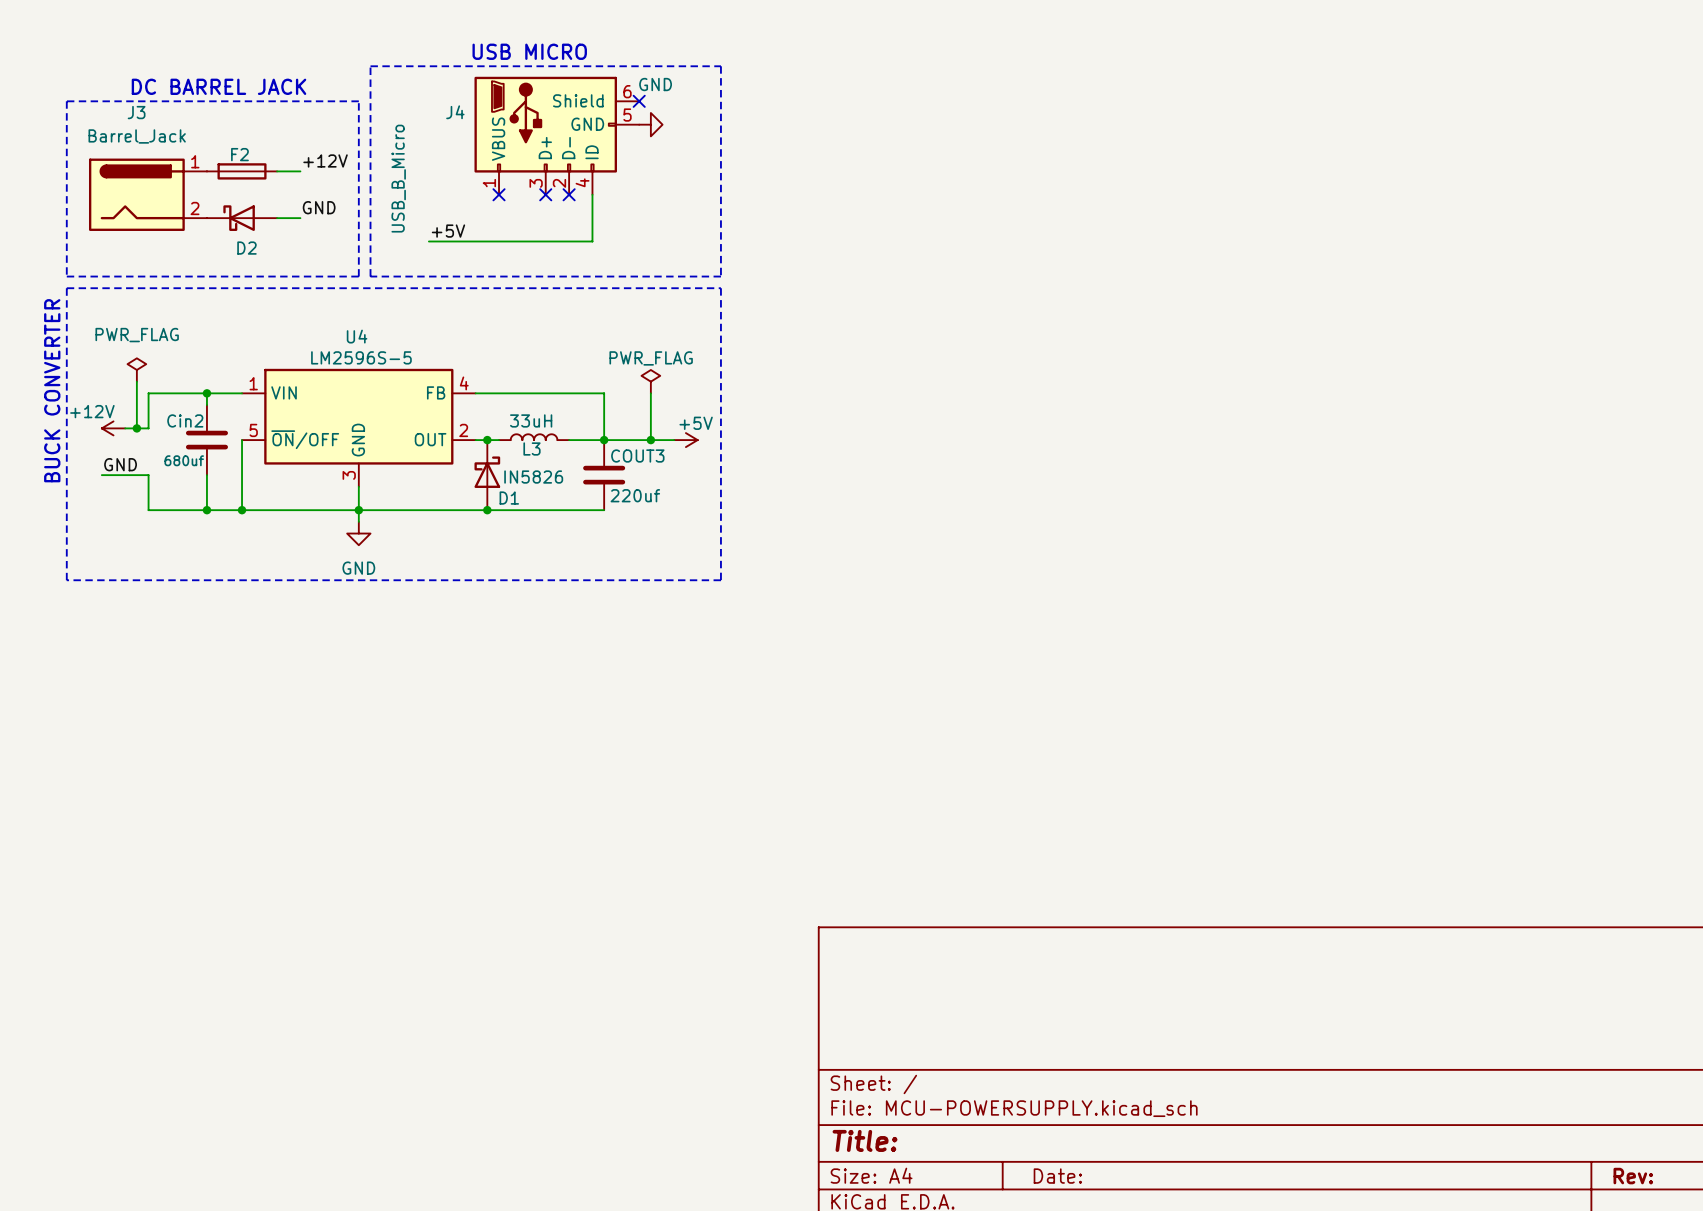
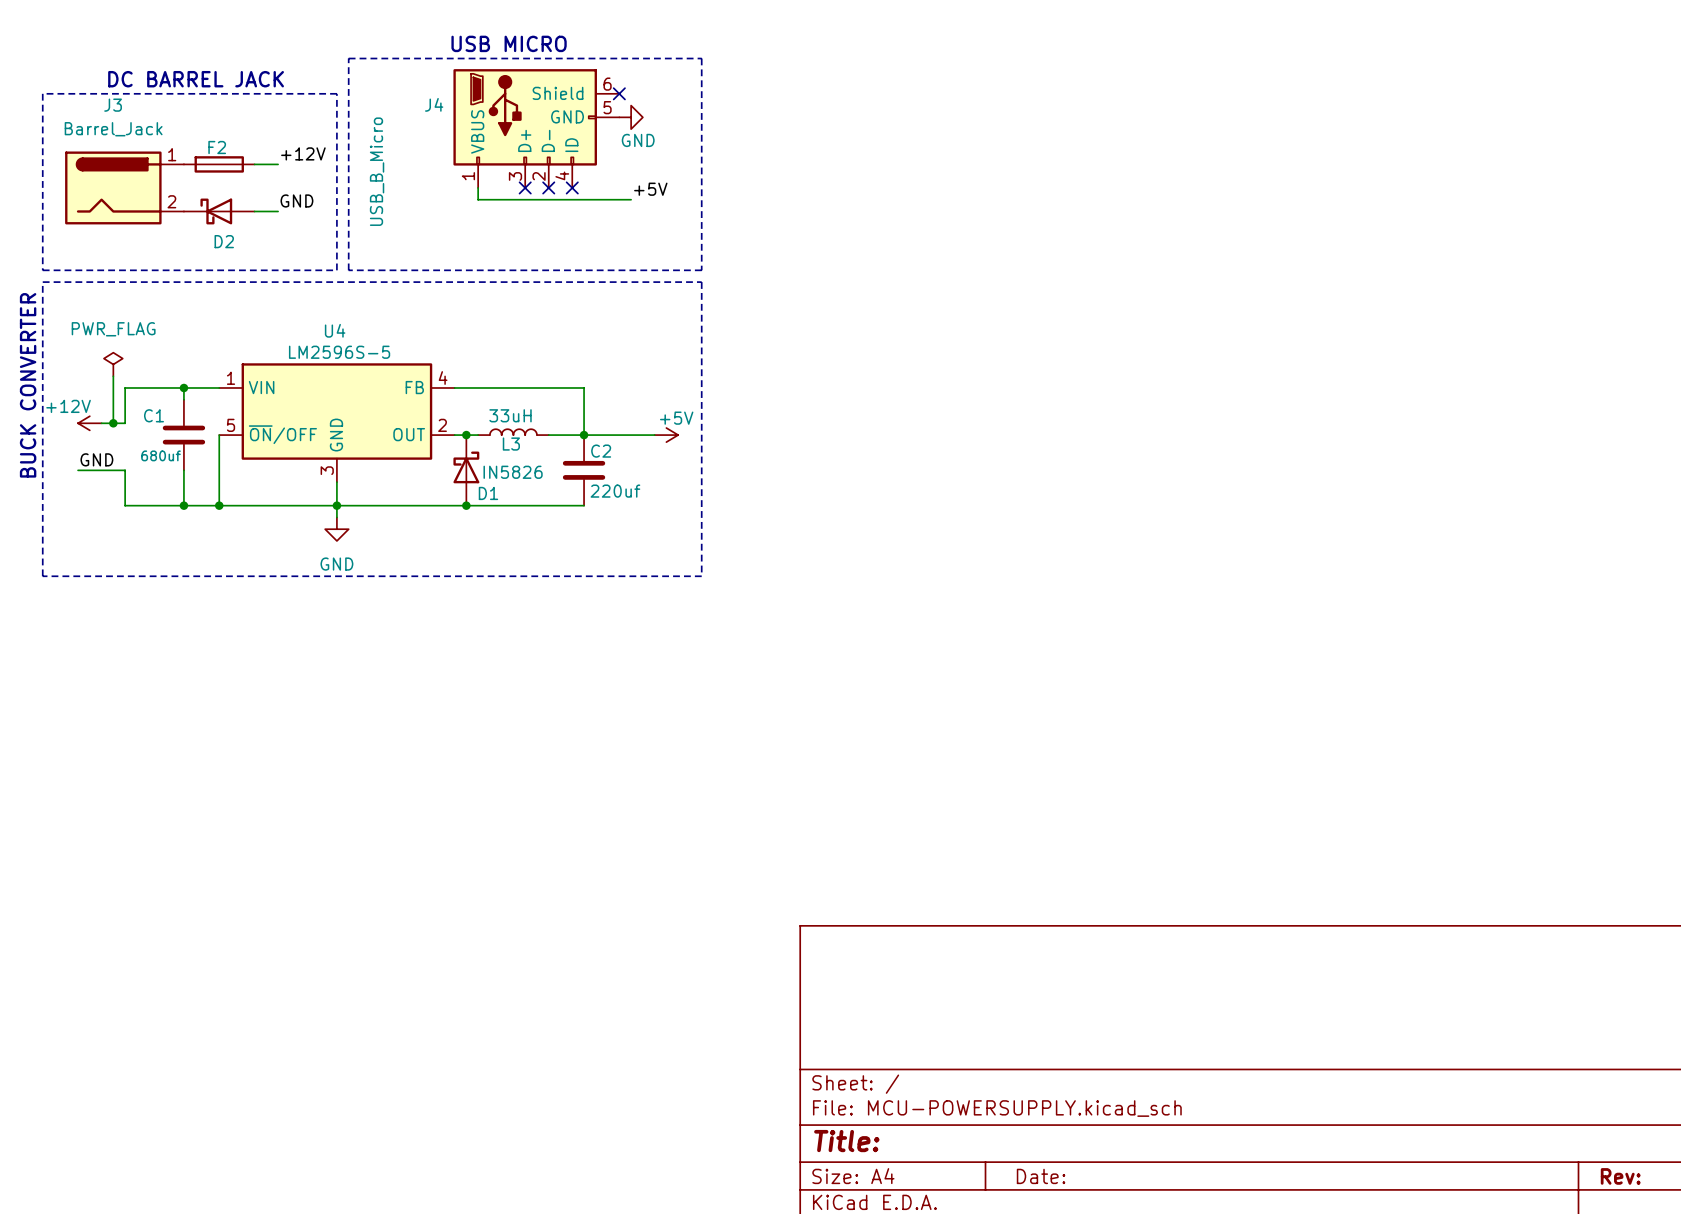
power symbol text position: GND (655, 84) -> GND (638, 140)
wire: none -> (478, 187) (478, 199) (631, 199)
no-connect mark: (499, 194) -> none
wire: (592, 194) (592, 241) (428, 241) -> none
no-connect mark: none -> (572, 187)
label position: +5V (448, 231) -> +5V (650, 189)
power symbol: PWR_FLAG (650, 381) -> none
wire: (650, 393) (650, 440) -> none
Cin2 name: Cin2 (185, 420) -> C1 (154, 415)
junction: (650, 440) -> none
COUT3 name: COUT3 (637, 456) -> C2 (601, 451)

